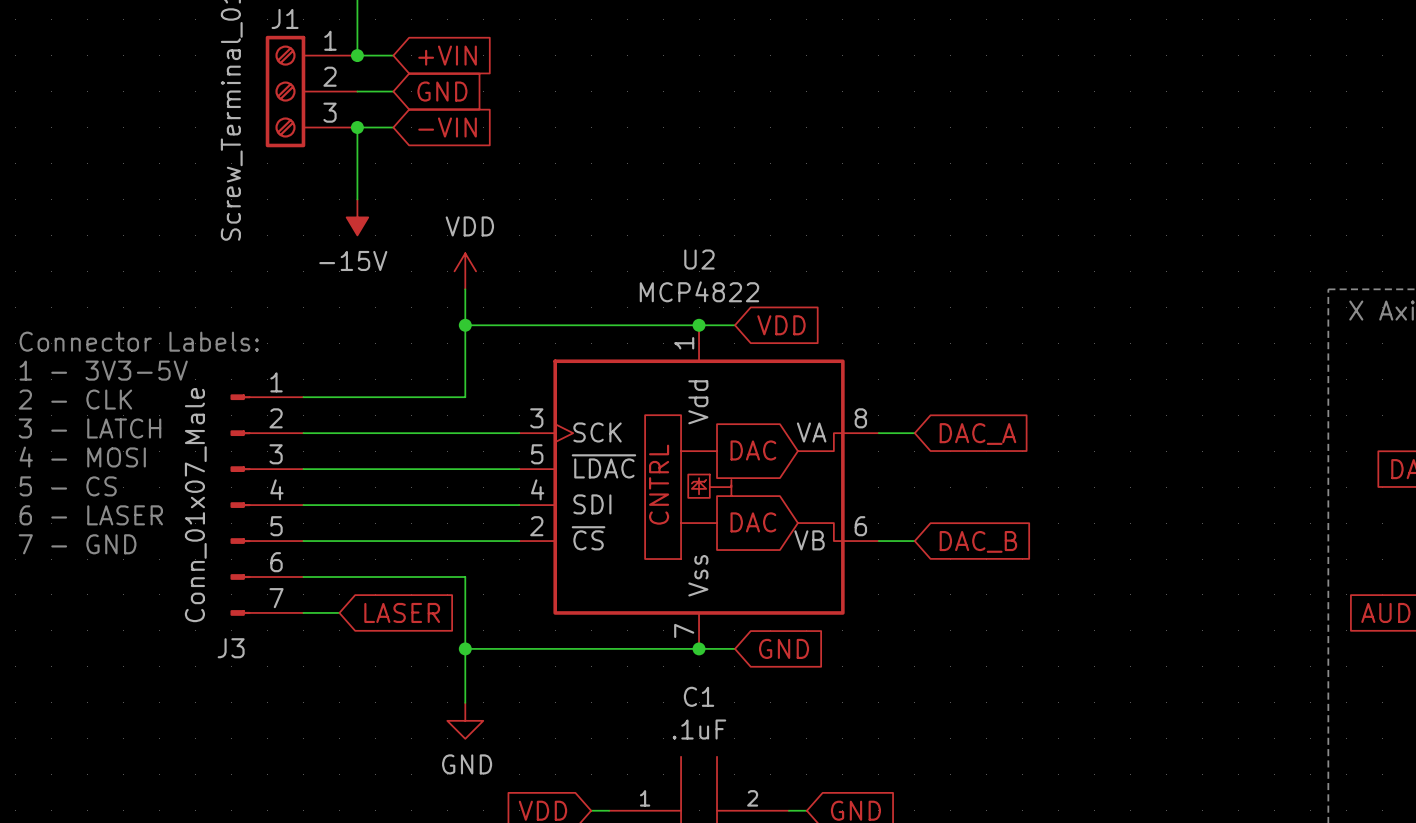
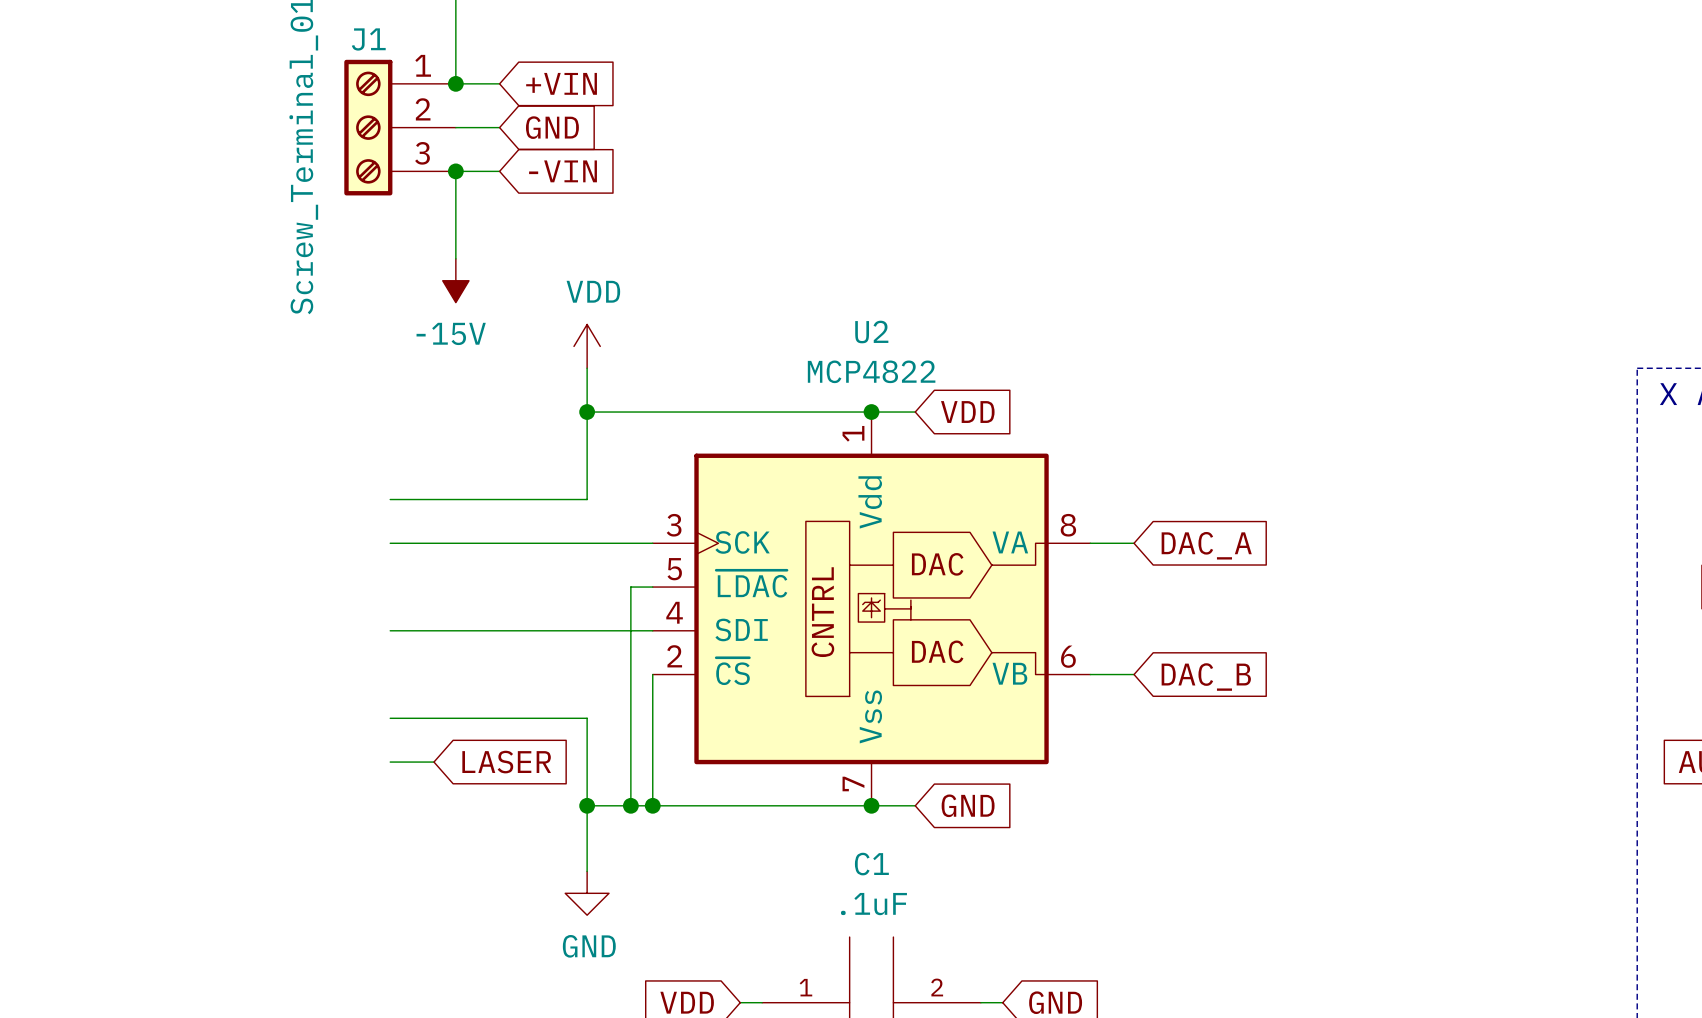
text: Connector Labels: (139, 341) -> none
text: 1 - 3V3-5V (103, 370) -> none
text: 2 - CLK (75, 399) -> none
text: 3 - LATCH (90, 428) -> none
text: 4 - MOSI (82, 457) -> none
wire: (303, 469) (501, 469) -> (630, 805) (630, 587)
text: 5 - CS (68, 486) -> none
J3: Conn_01x07_Male (266, 505) -> none
text: 6 - LASER (91, 515) -> none
wire: (303, 541) (519, 541) -> (652, 805) (652, 674)
text: 7 - GND (77, 544) -> none
junction: none -> (630, 805)
junction: none -> (652, 805)

